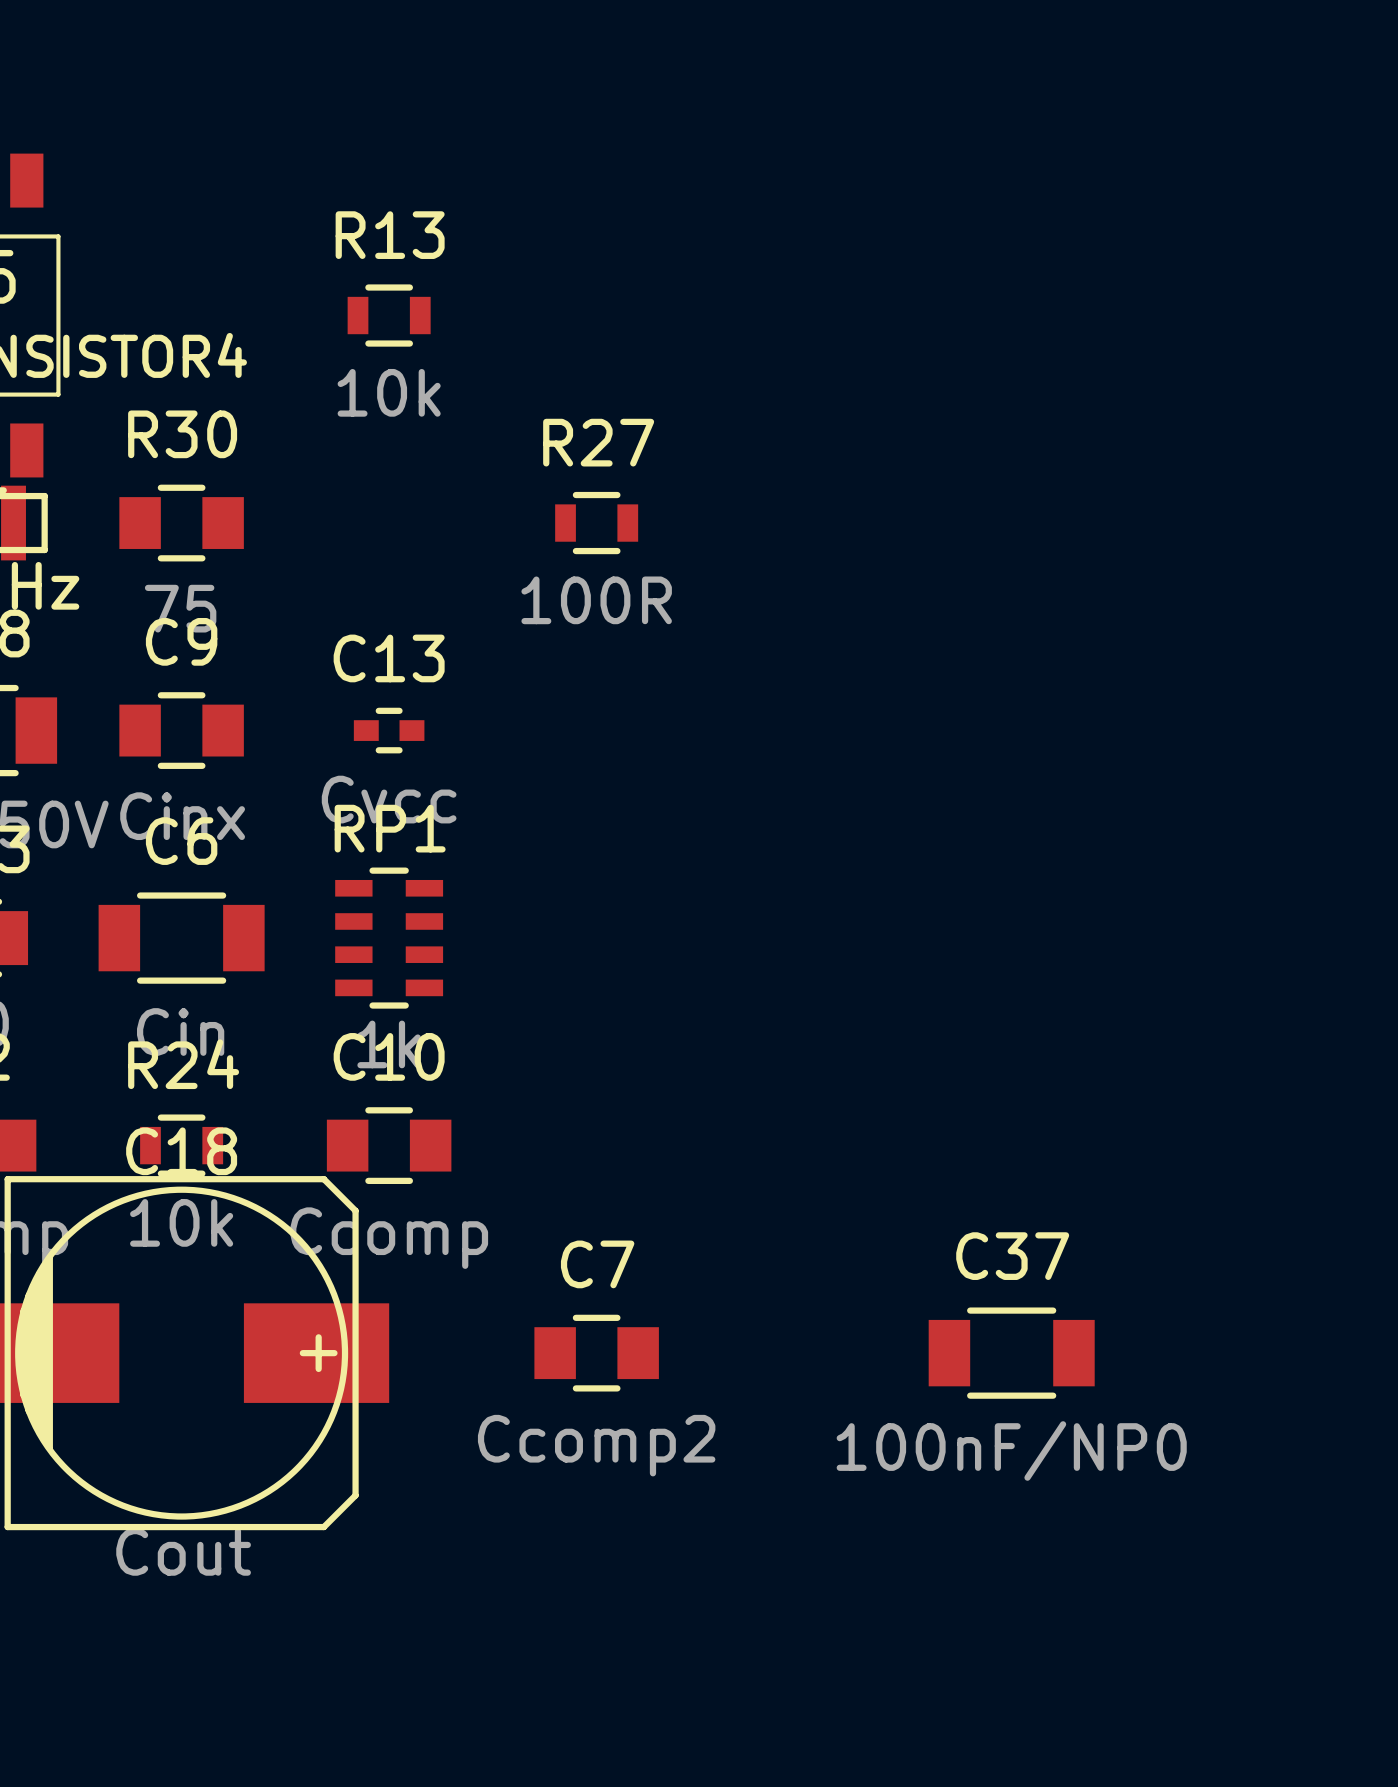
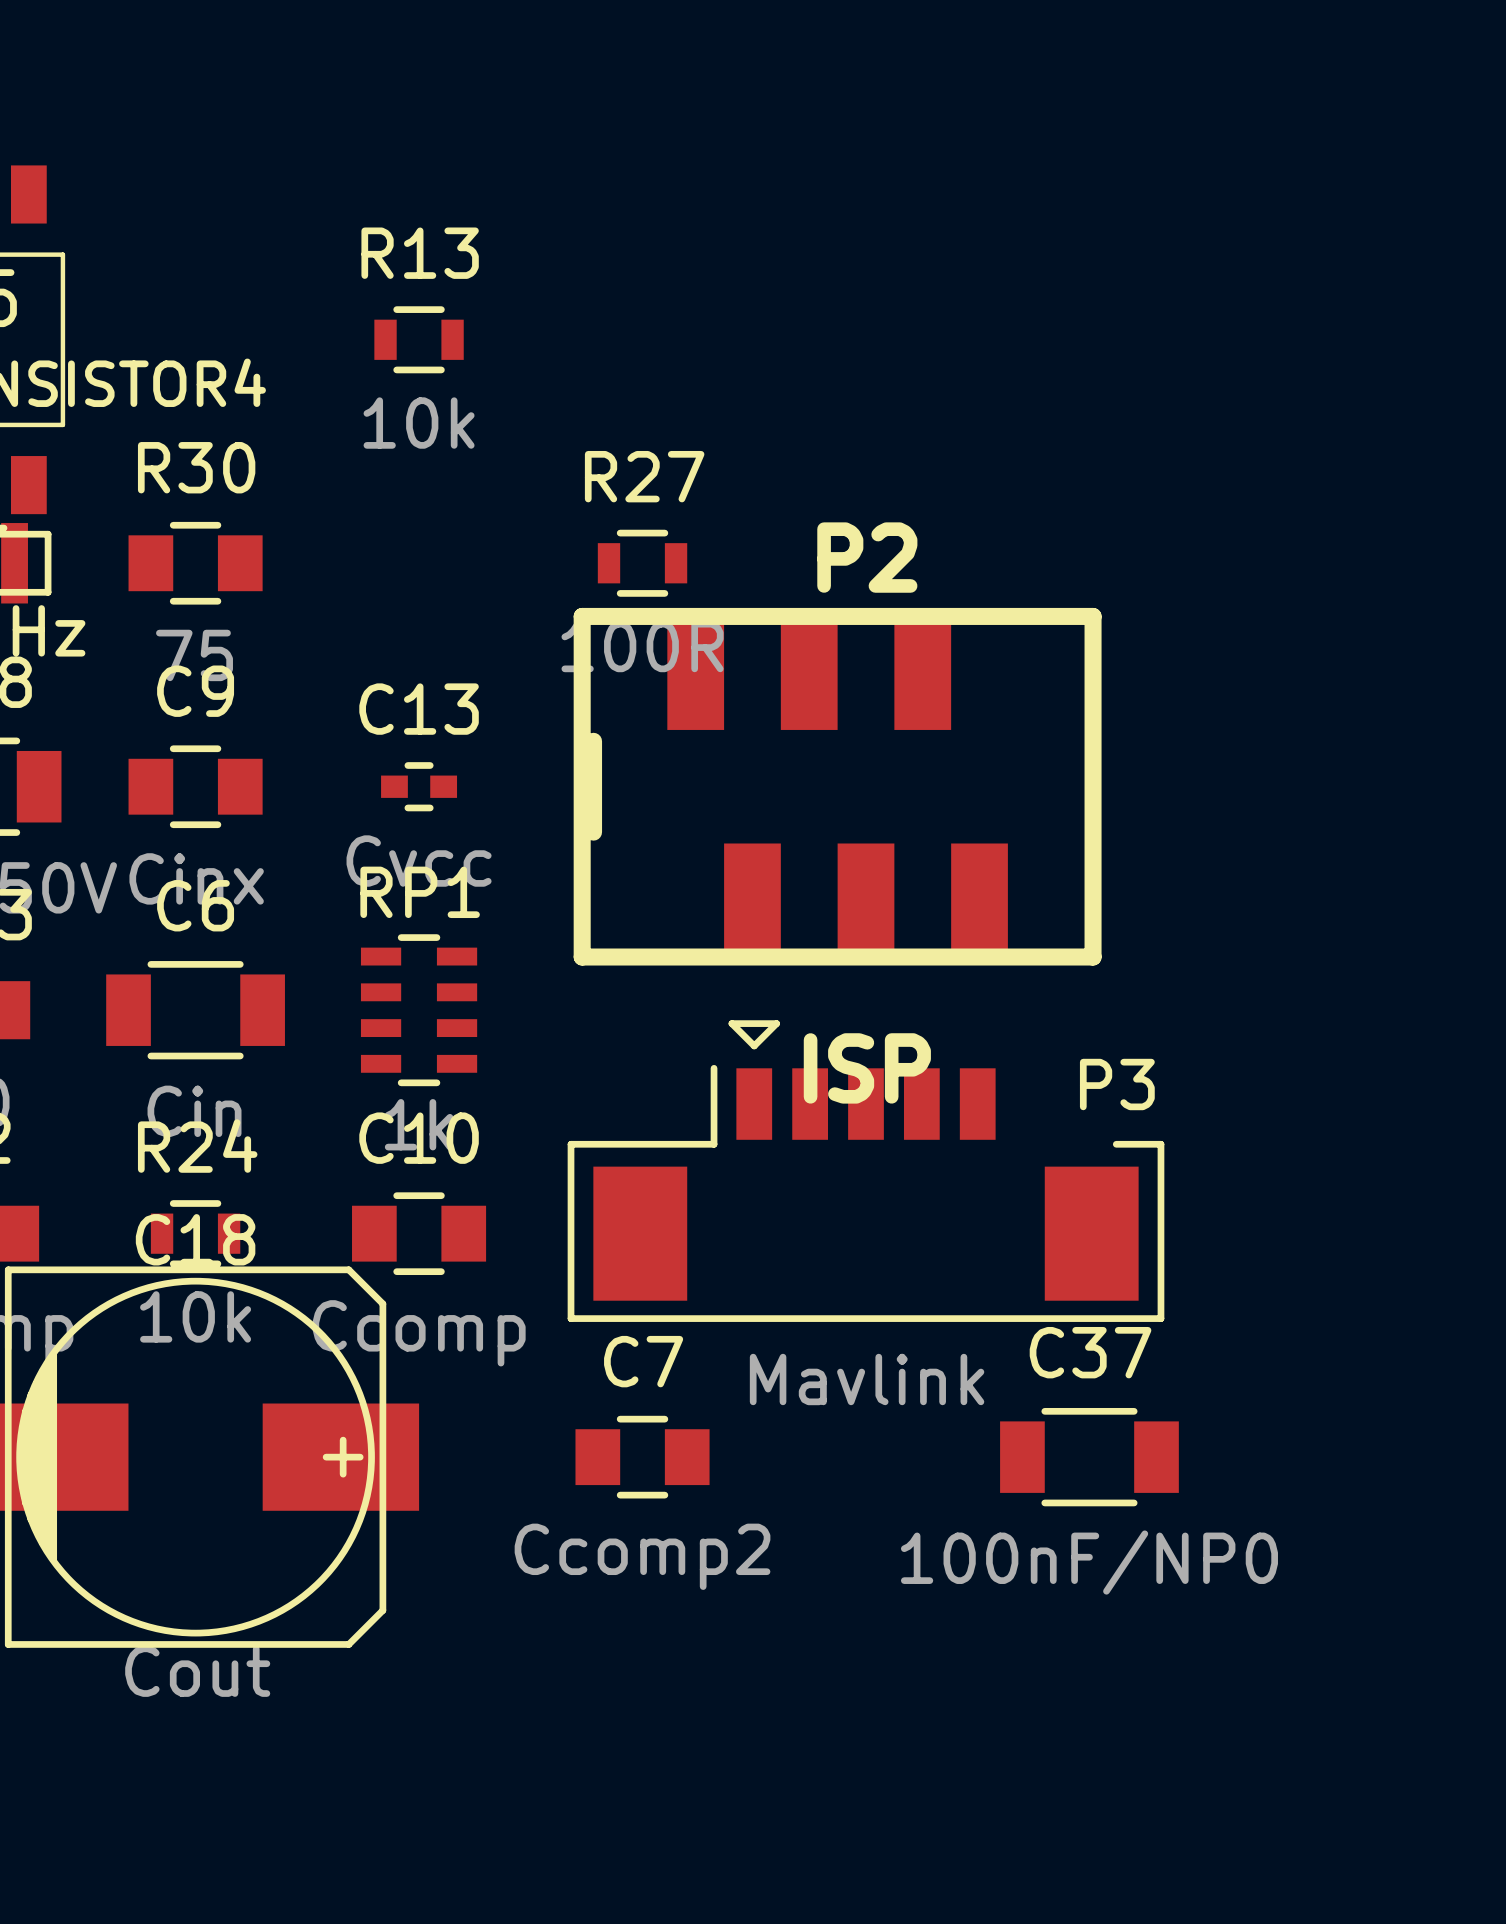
P2: none -> ISP (837, 786)
P3: none -> Mavlink (865, 1171)

